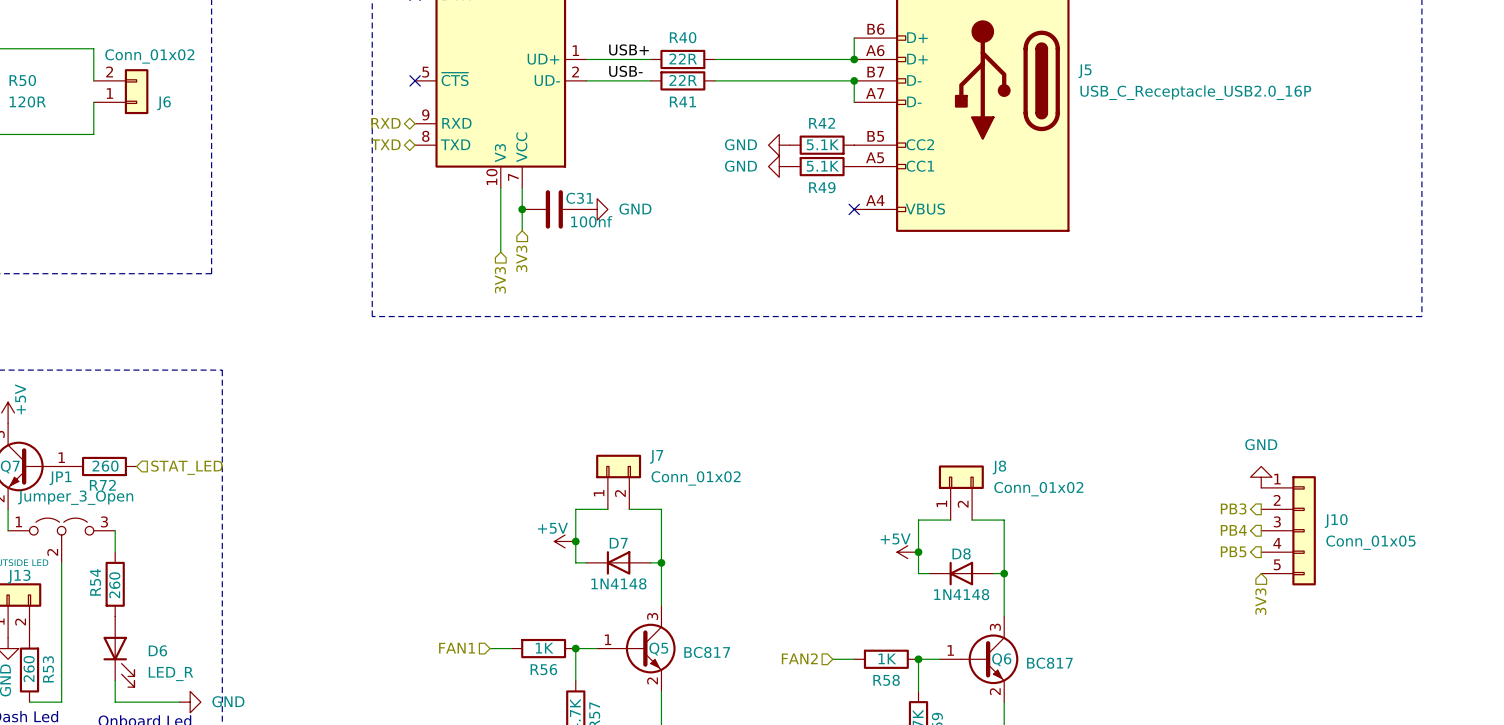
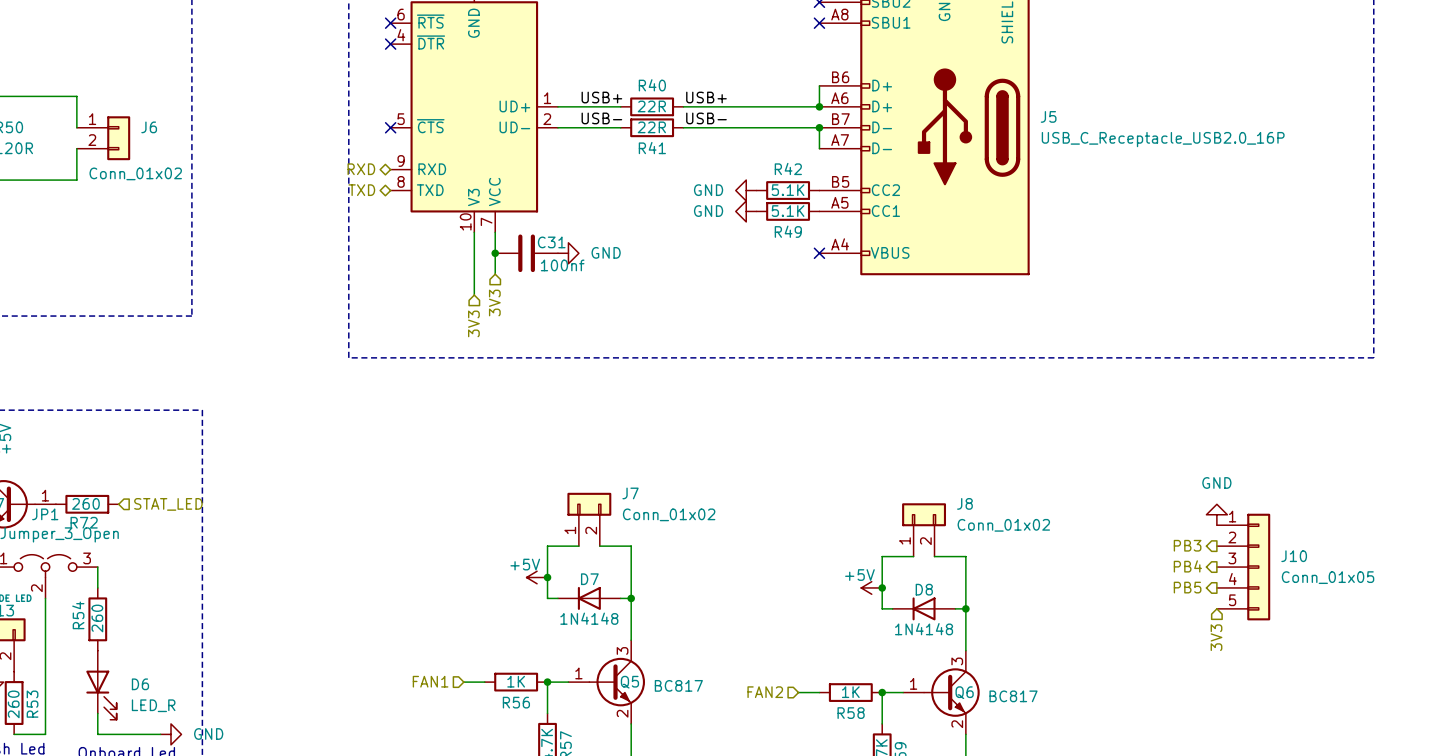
label: none -> USB+ (706, 97)
label: none -> USB- (706, 118)
J6 flip: as is (136, 91) -> up-down (118, 138)

